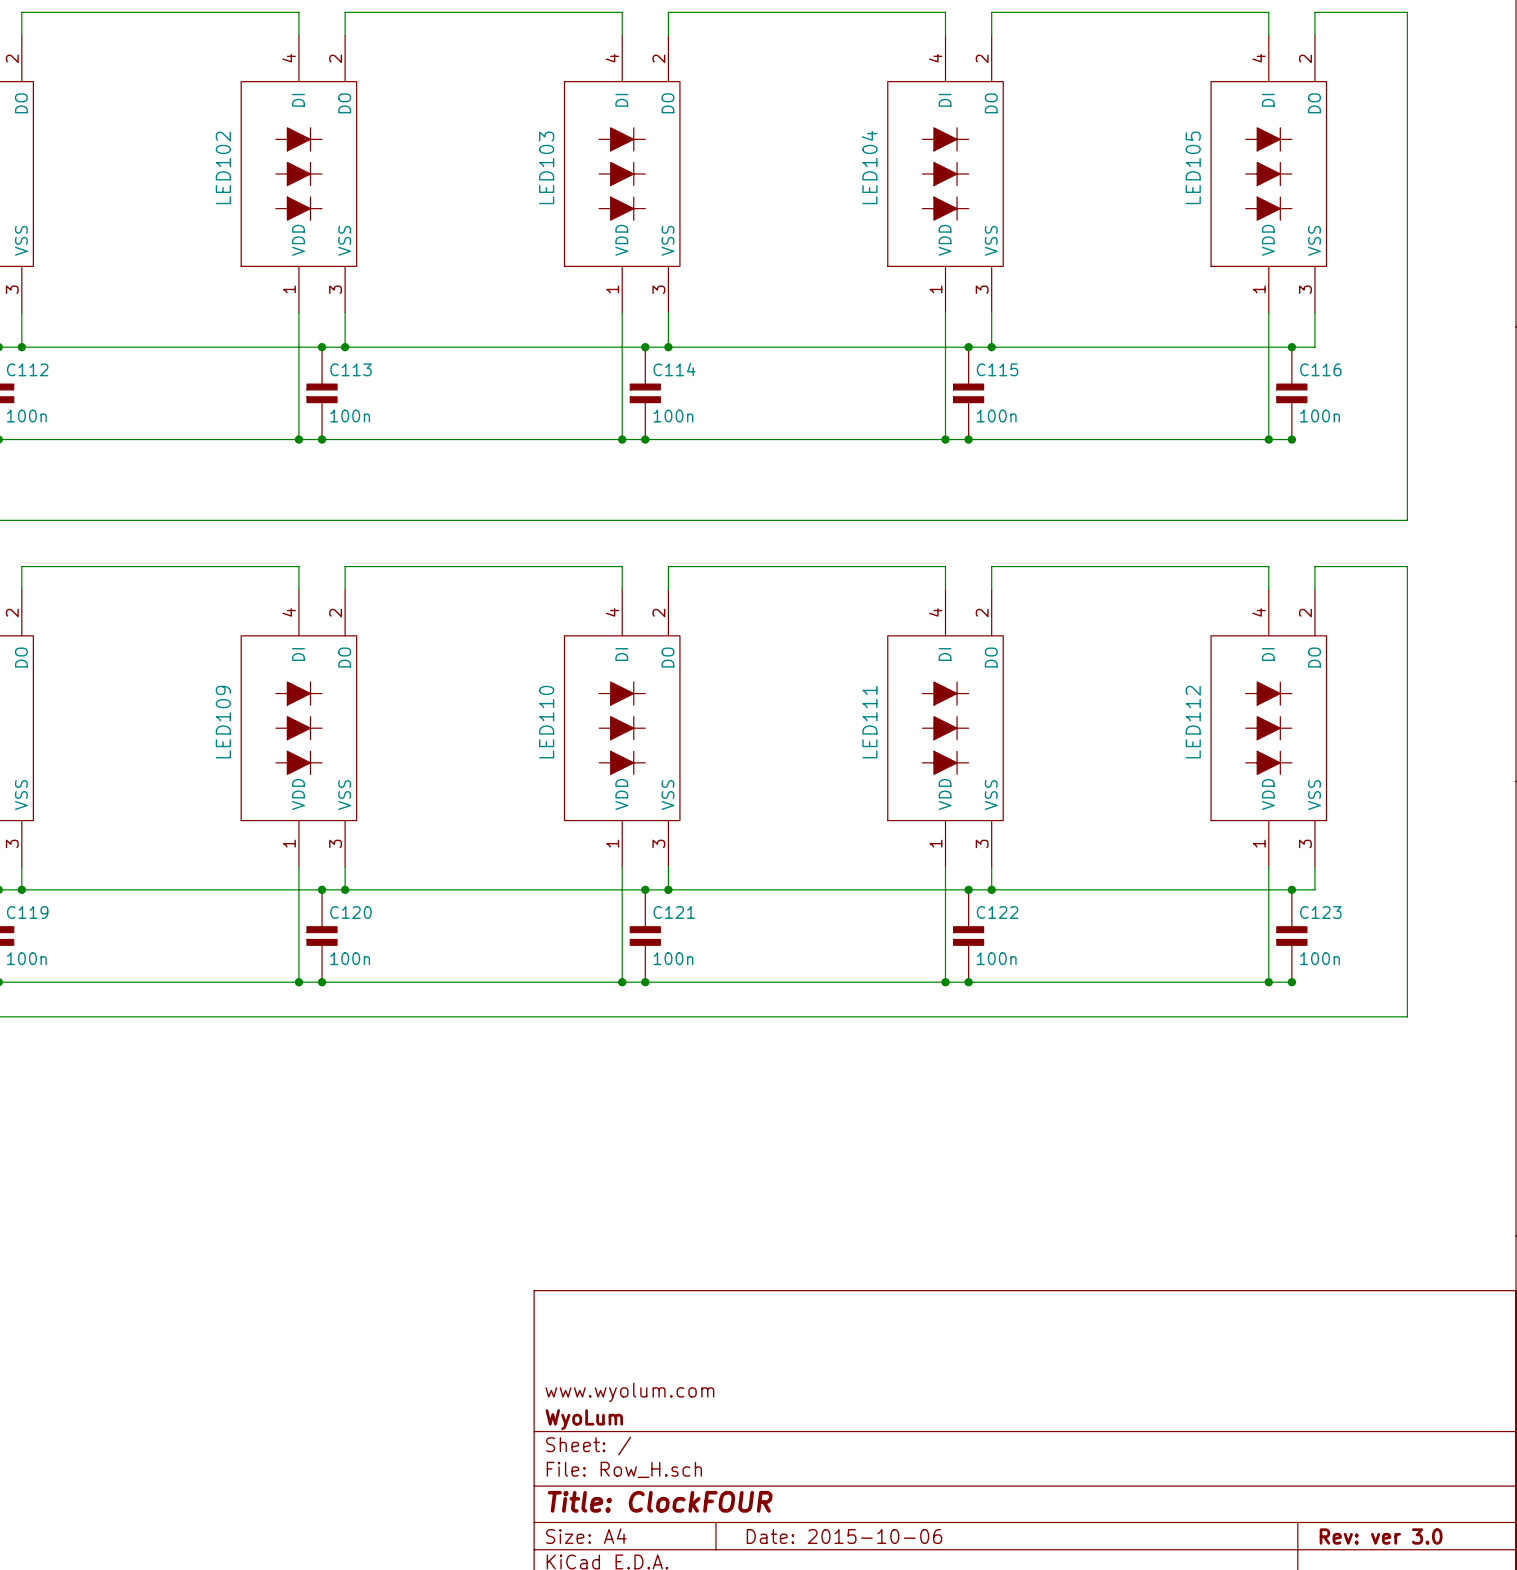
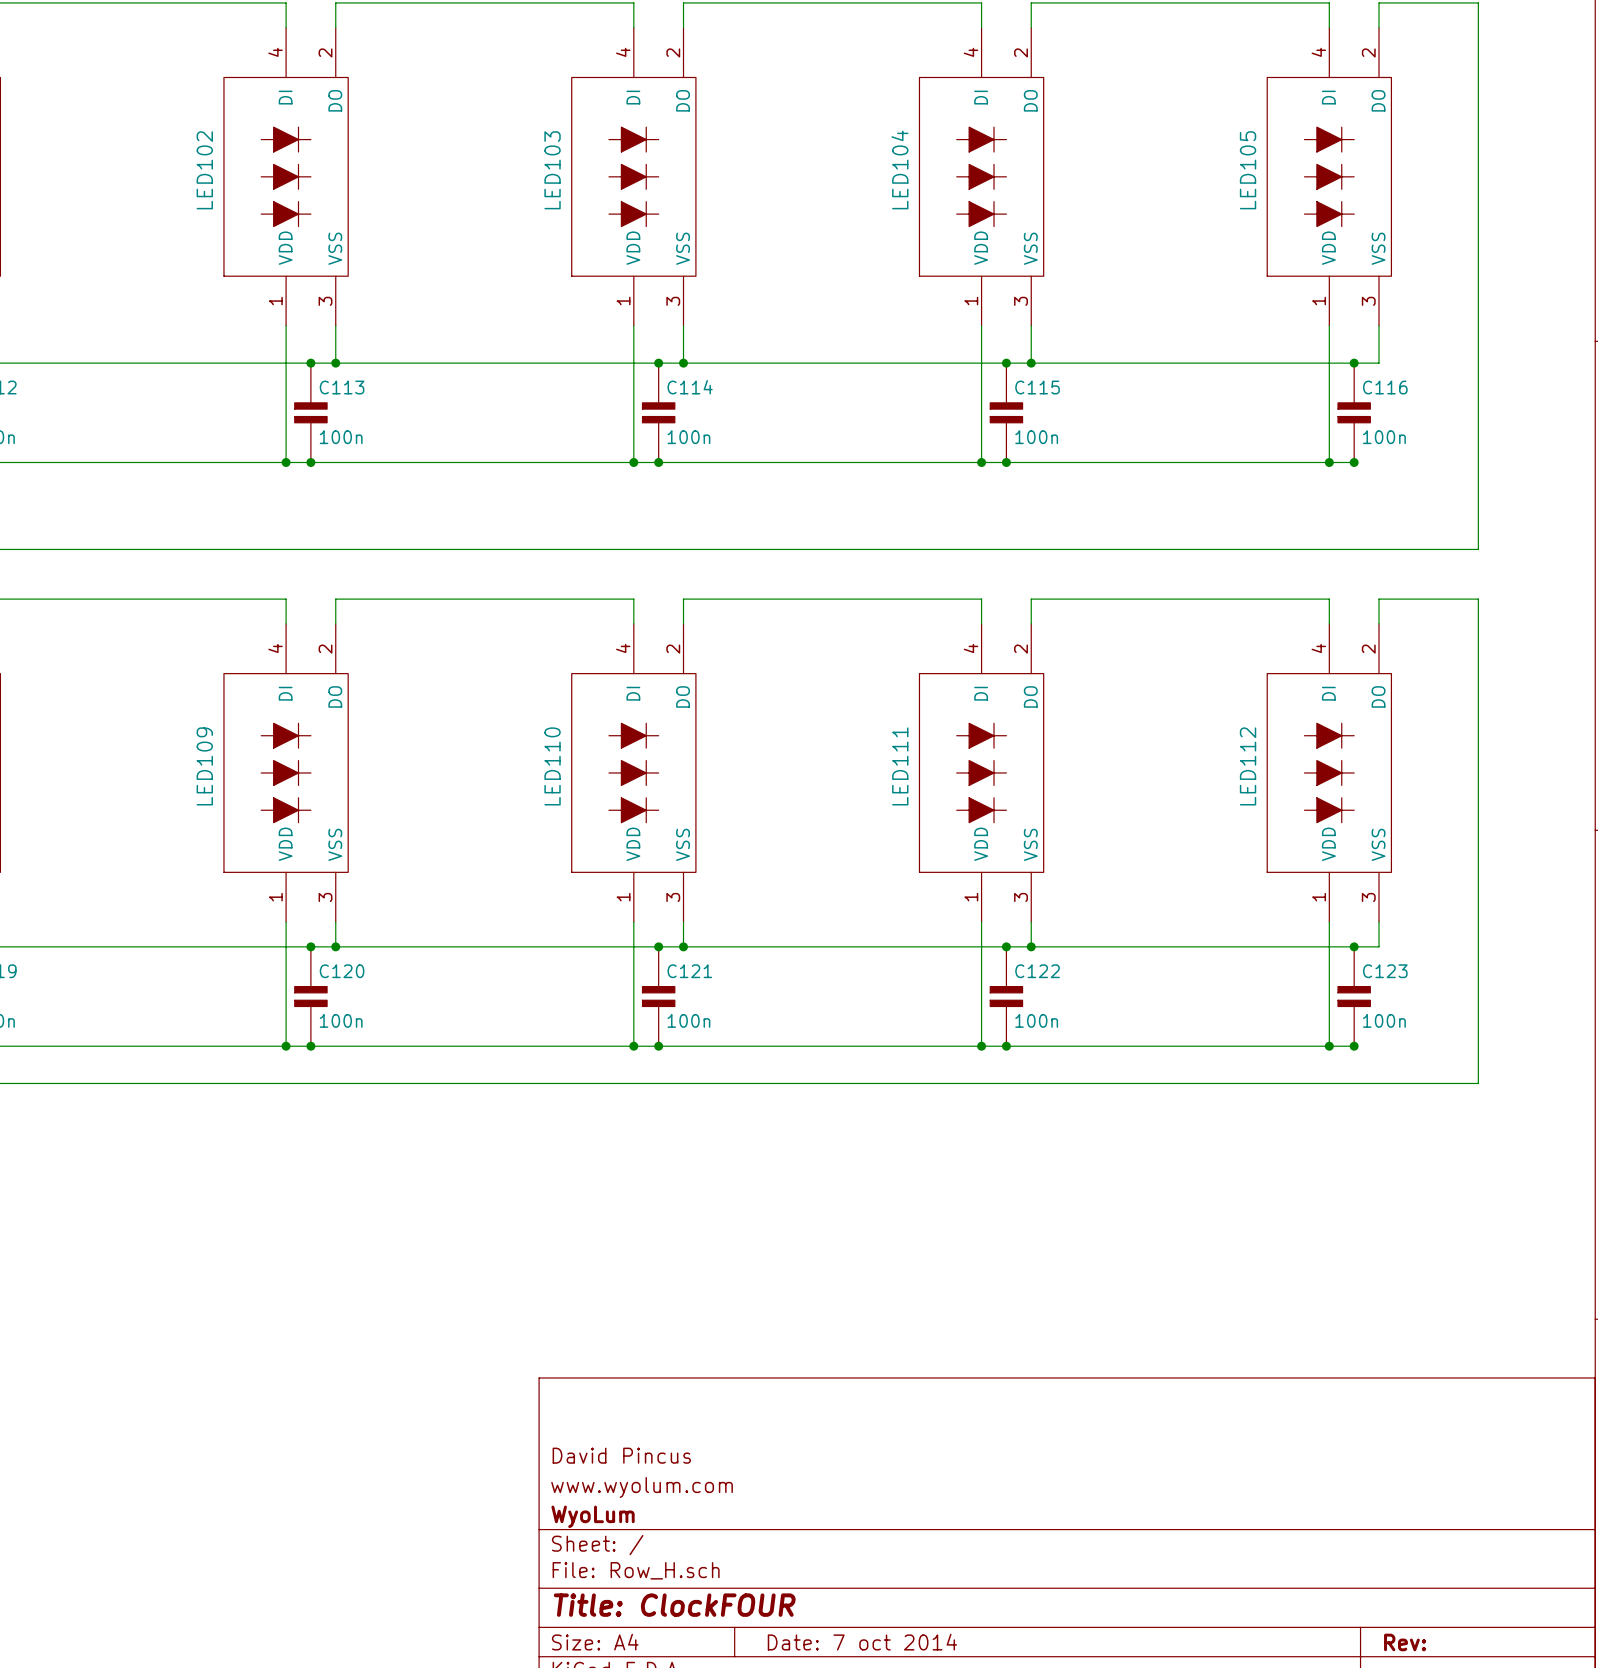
title block: none -> David Pincus (621, 1455)
title block: Date: 2015-10-06 (844, 1536) -> Date: 7 oct 2014 (862, 1642)
title block: Rev: ver 3.0 (1381, 1536) -> Rev: (1405, 1642)

